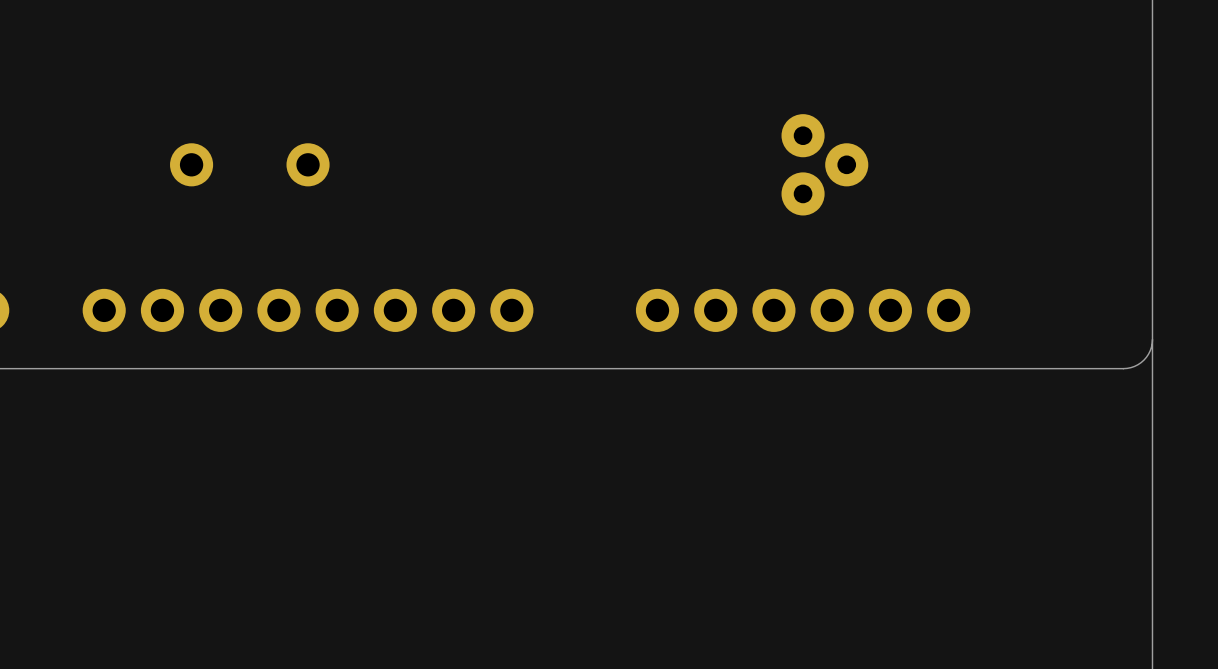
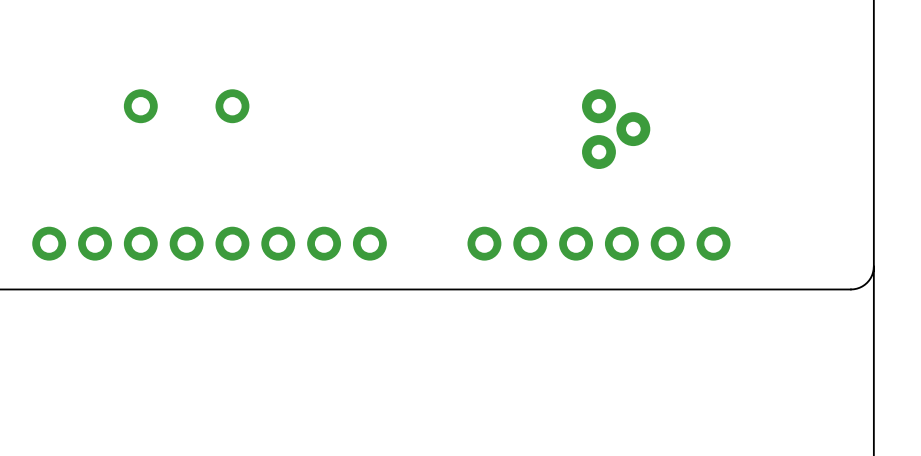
part position: (191, 164) -> (140, 106)
part position: (308, 164) -> (232, 106)

